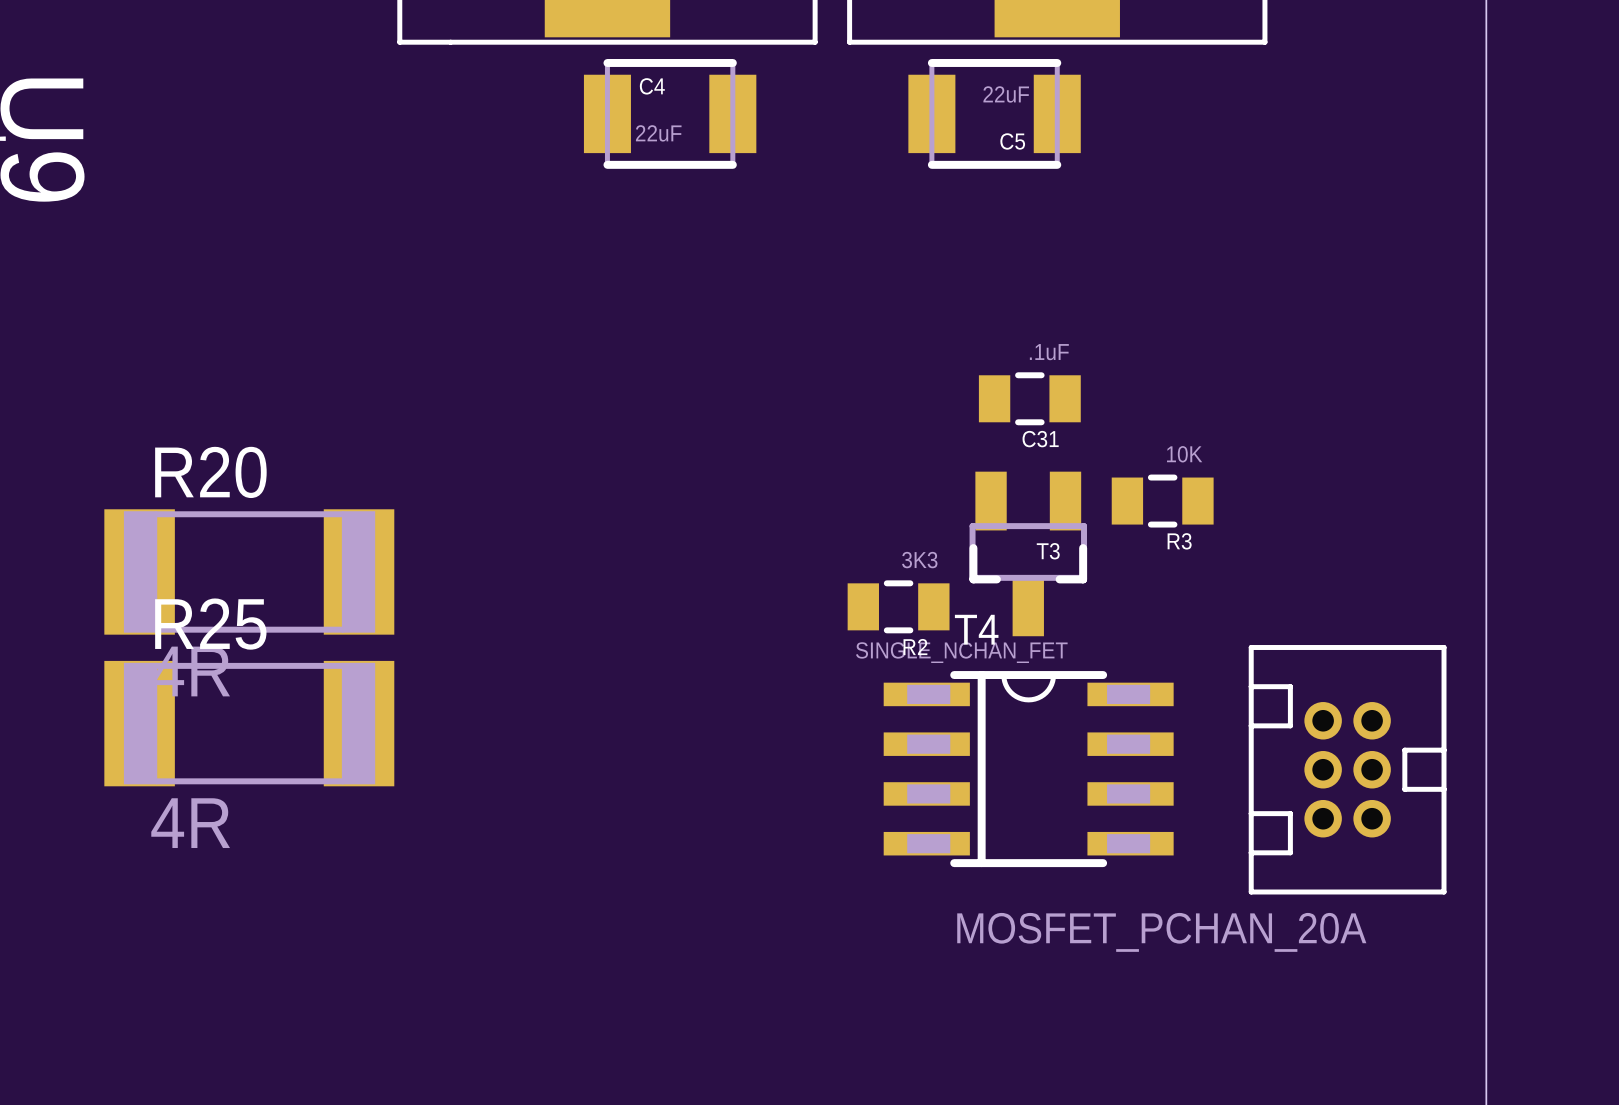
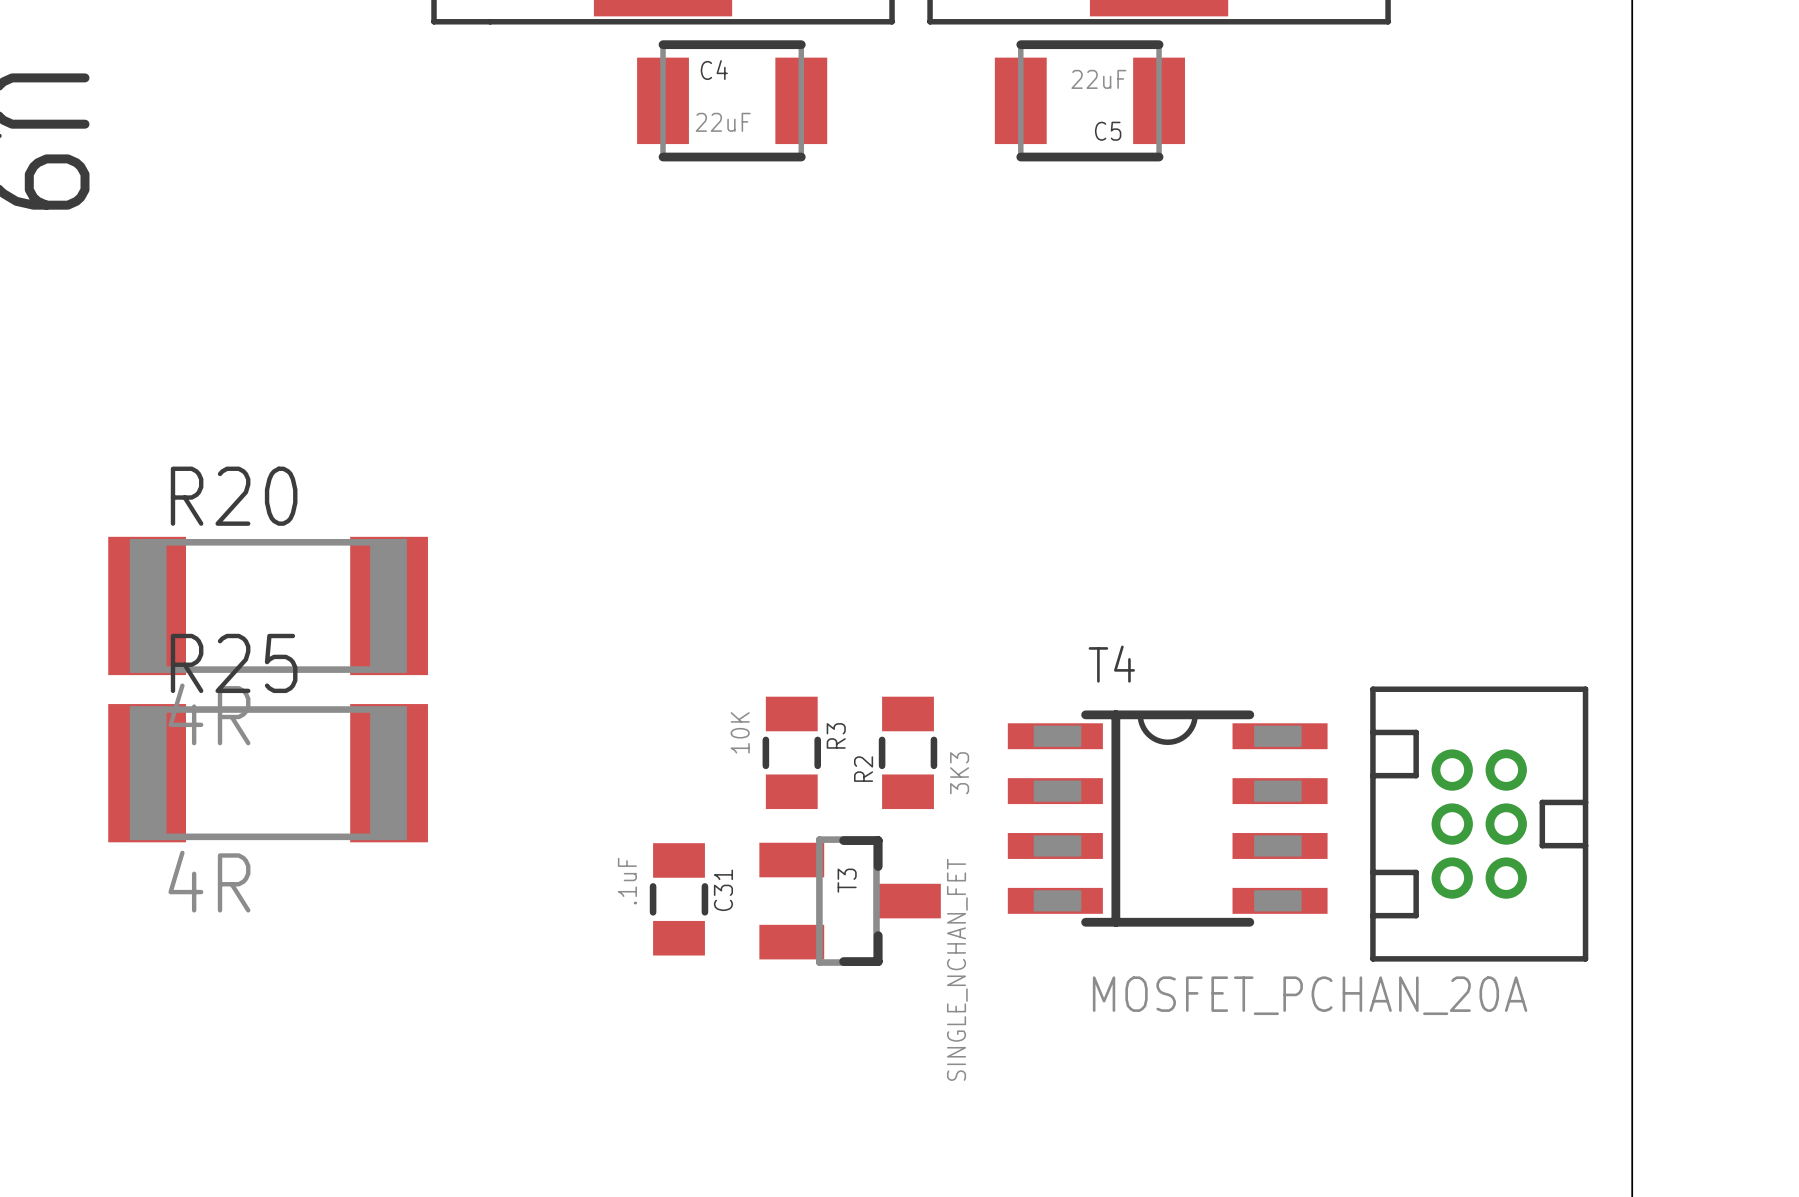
C31 rotation: 0° (1029, 398) -> 90° clockwise (679, 899)
C31 position: (1029, 398) -> (679, 899)
R3 rotation: 0° (1162, 501) -> 90° clockwise (791, 752)
R3 position: (1162, 501) -> (791, 752)
T3 rotation: 0° (1028, 553) -> 90° counterclockwise (850, 901)
T3 position: (1028, 553) -> (850, 901)
R2 rotation: 0° (898, 606) -> 90° clockwise (908, 752)
R2 position: (898, 606) -> (908, 752)
T4 position: (1028, 769) -> (1167, 818)

